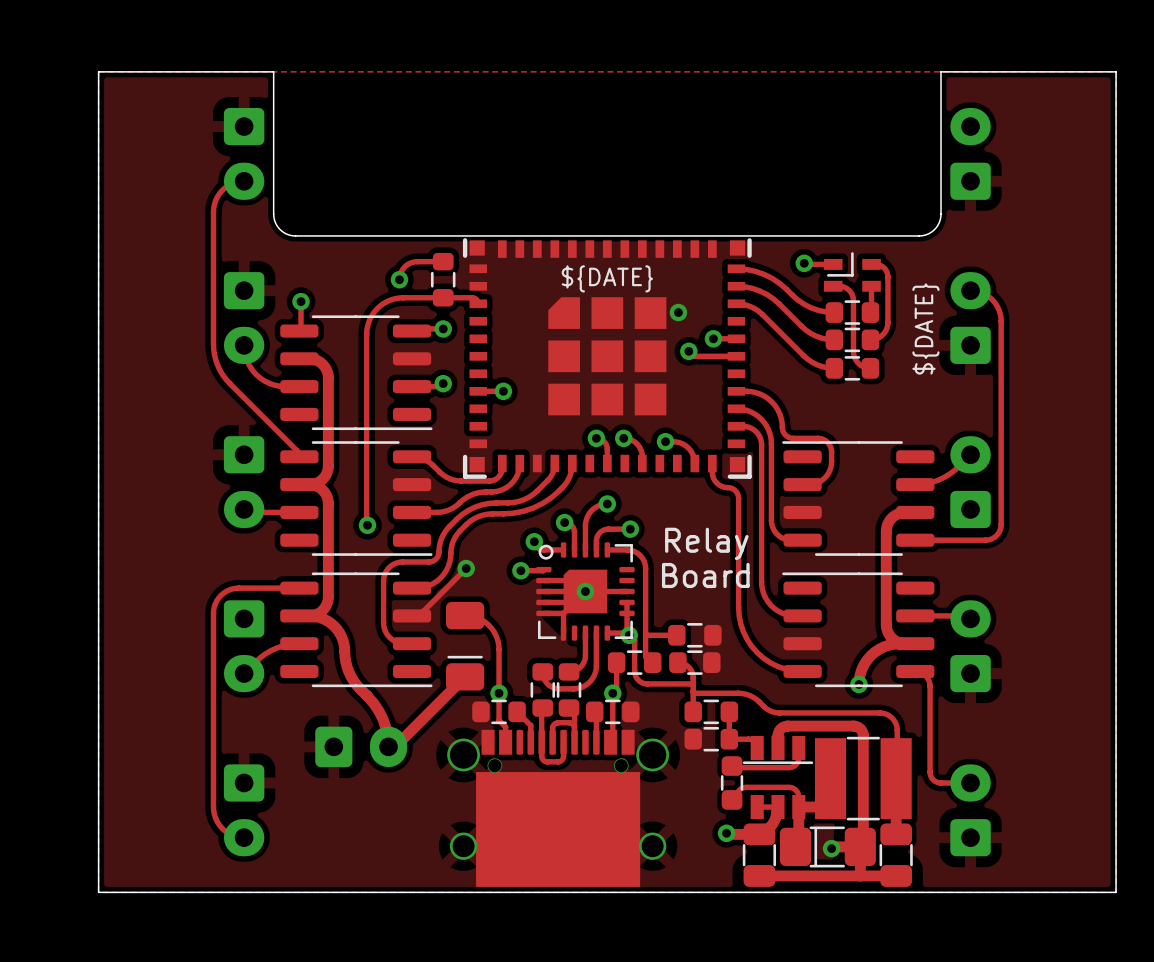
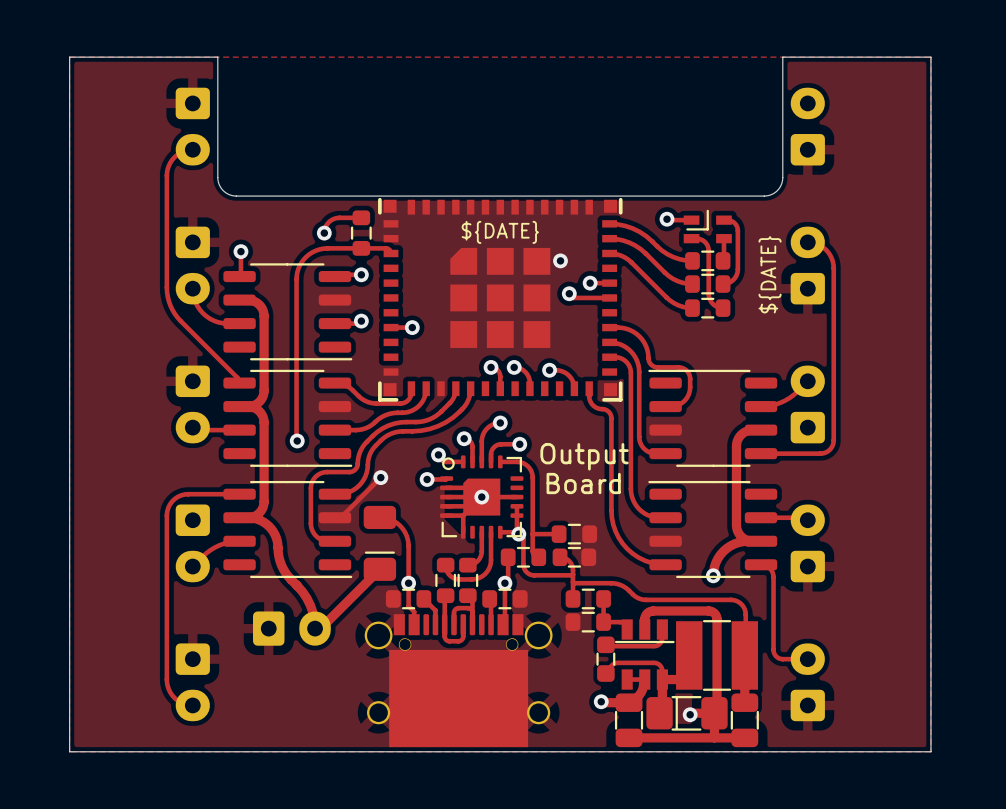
text: Relay (706, 543) -> Output (584, 456)

